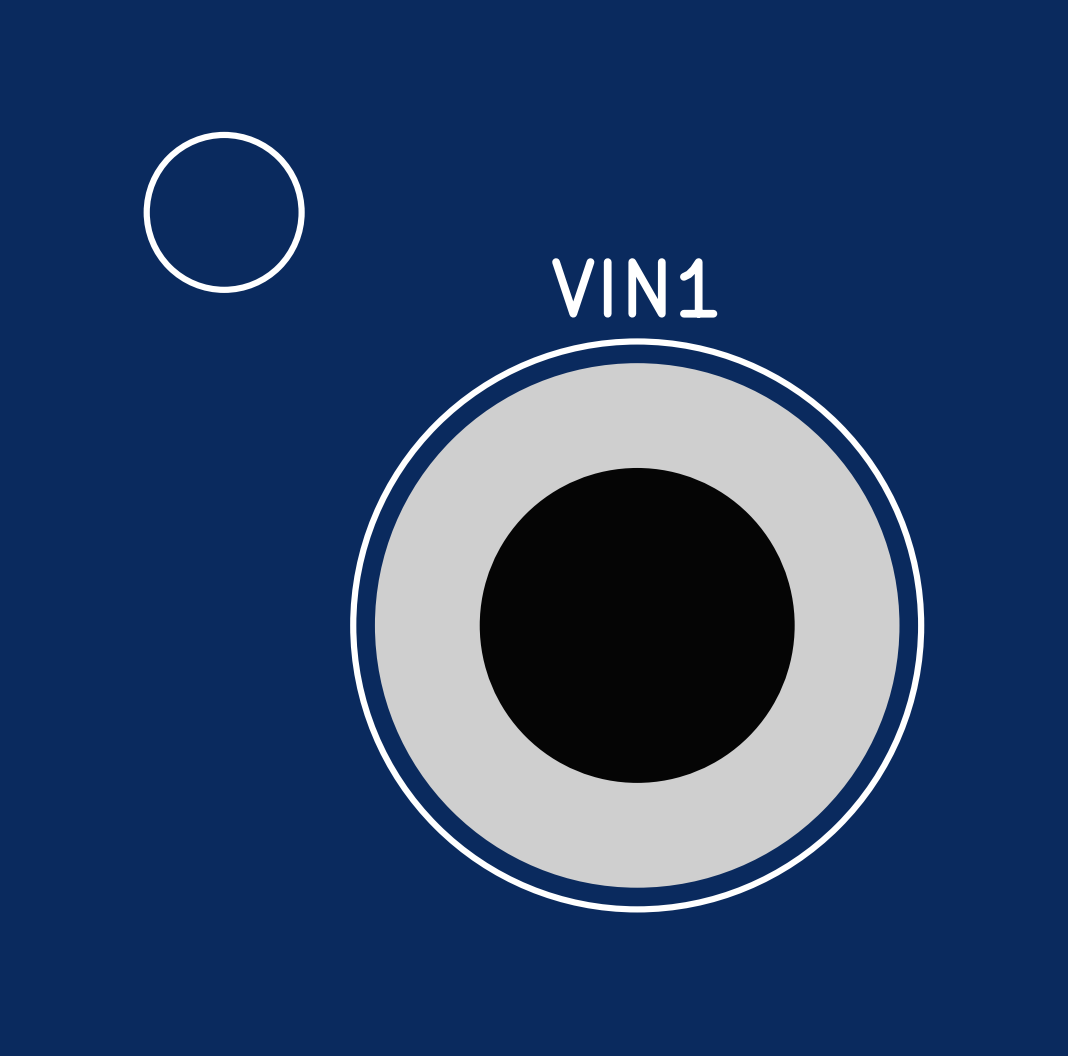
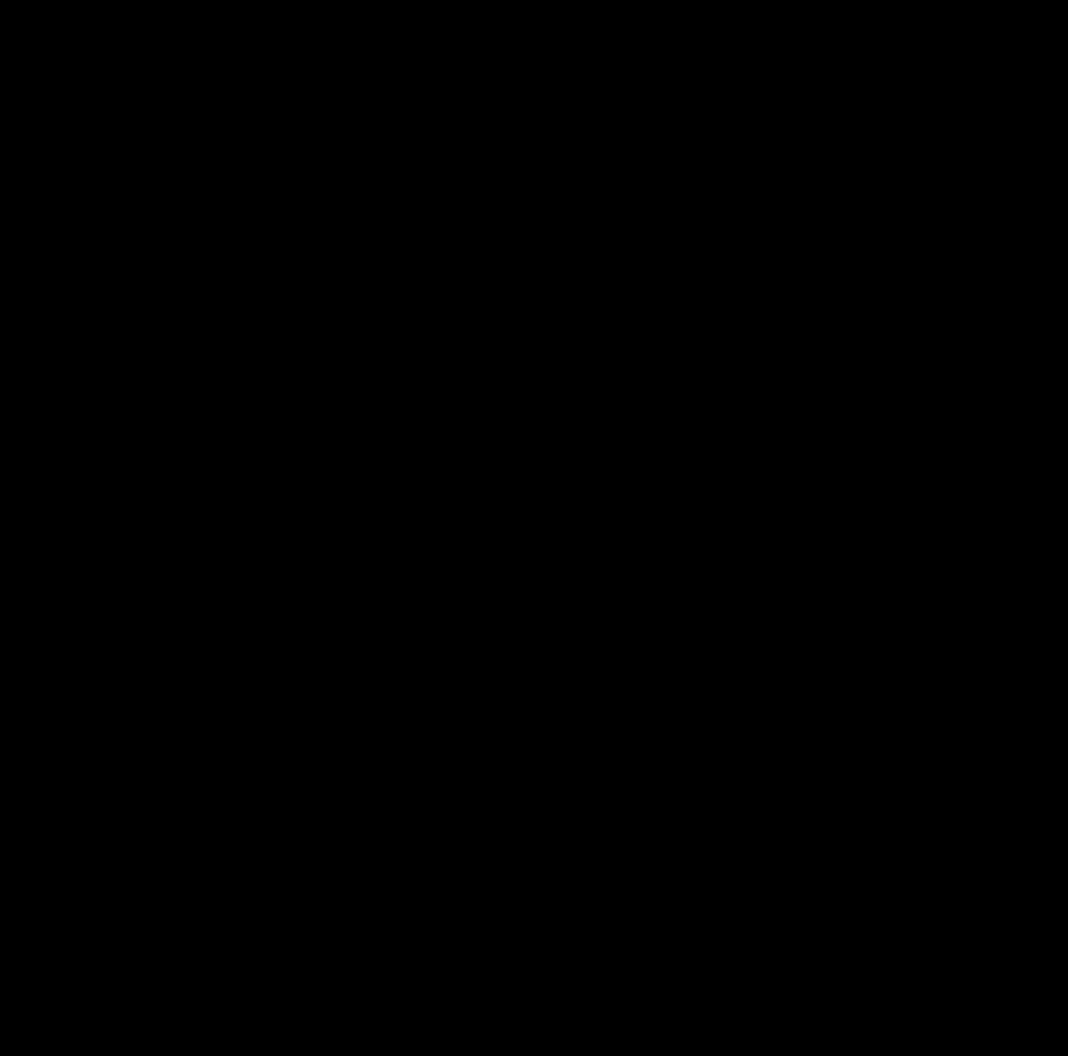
drawing: [143, 131, 305, 293] -> none
VIN1: (637, 625) -> none

